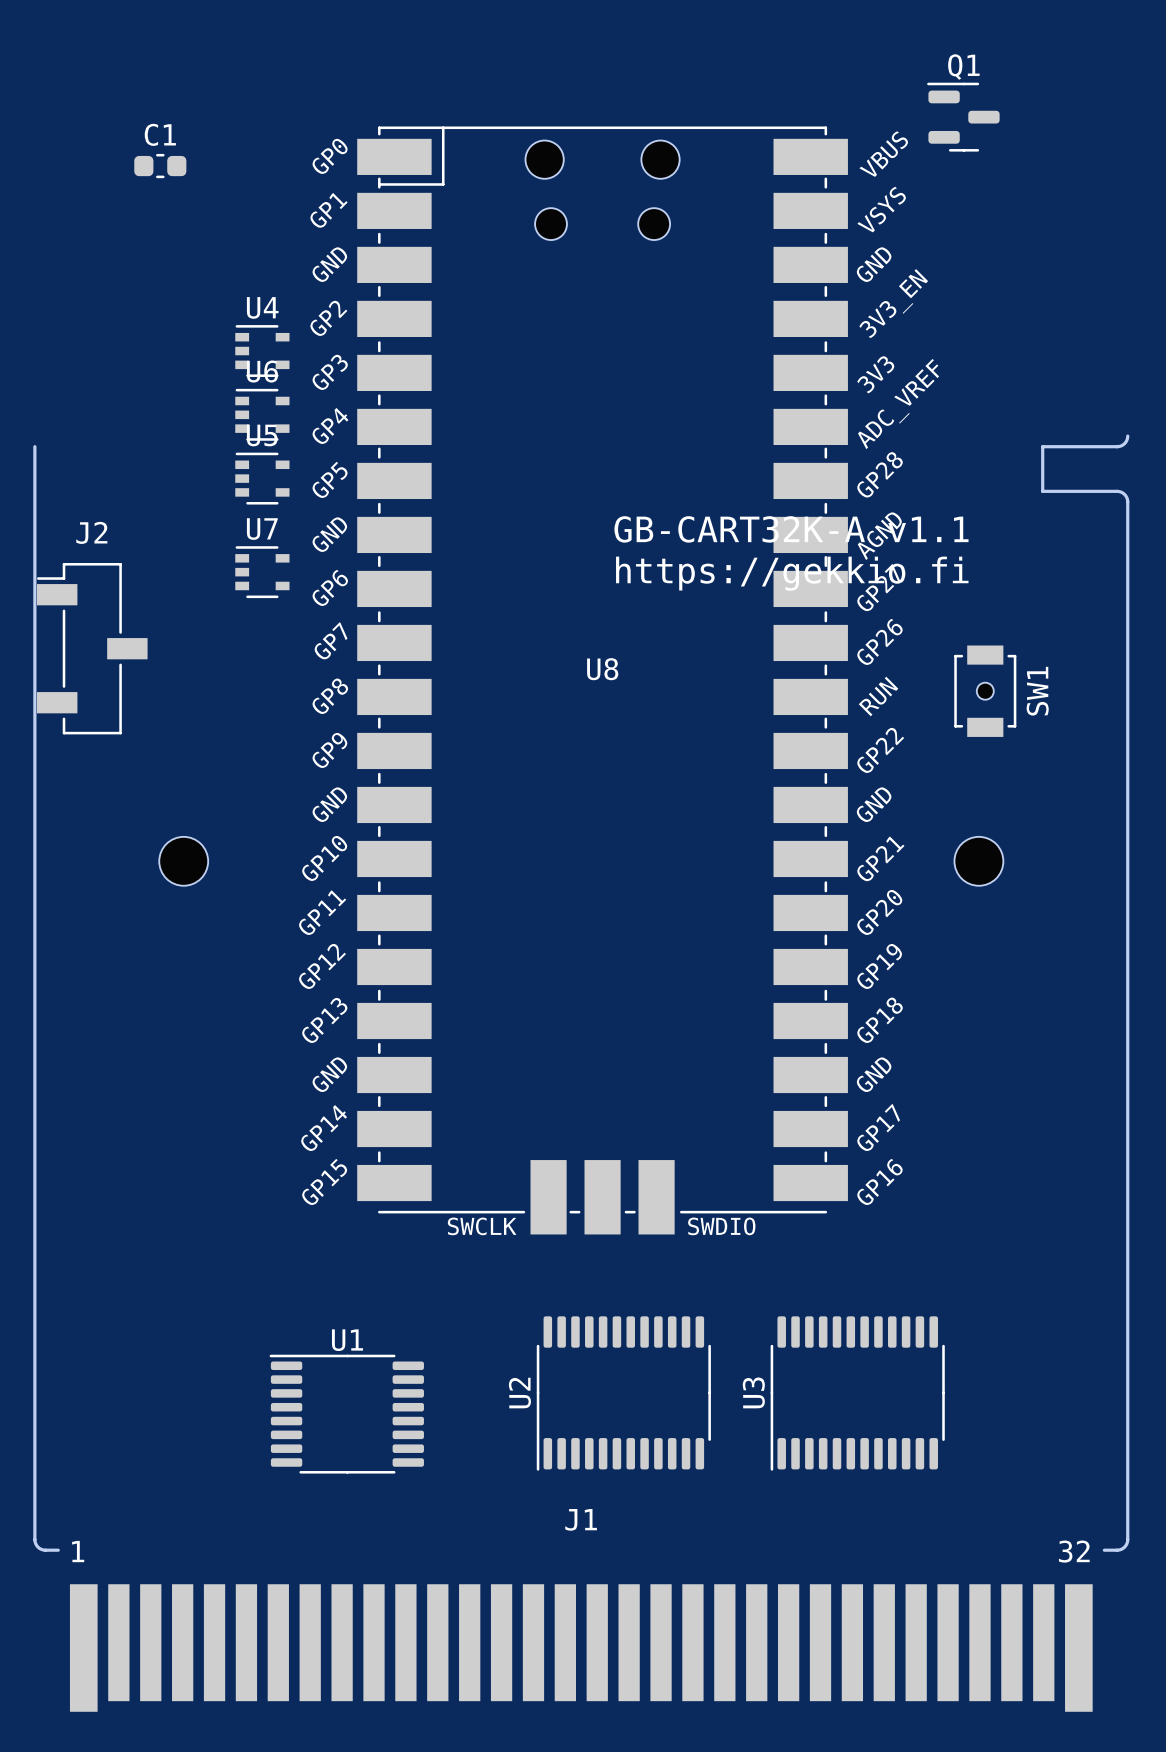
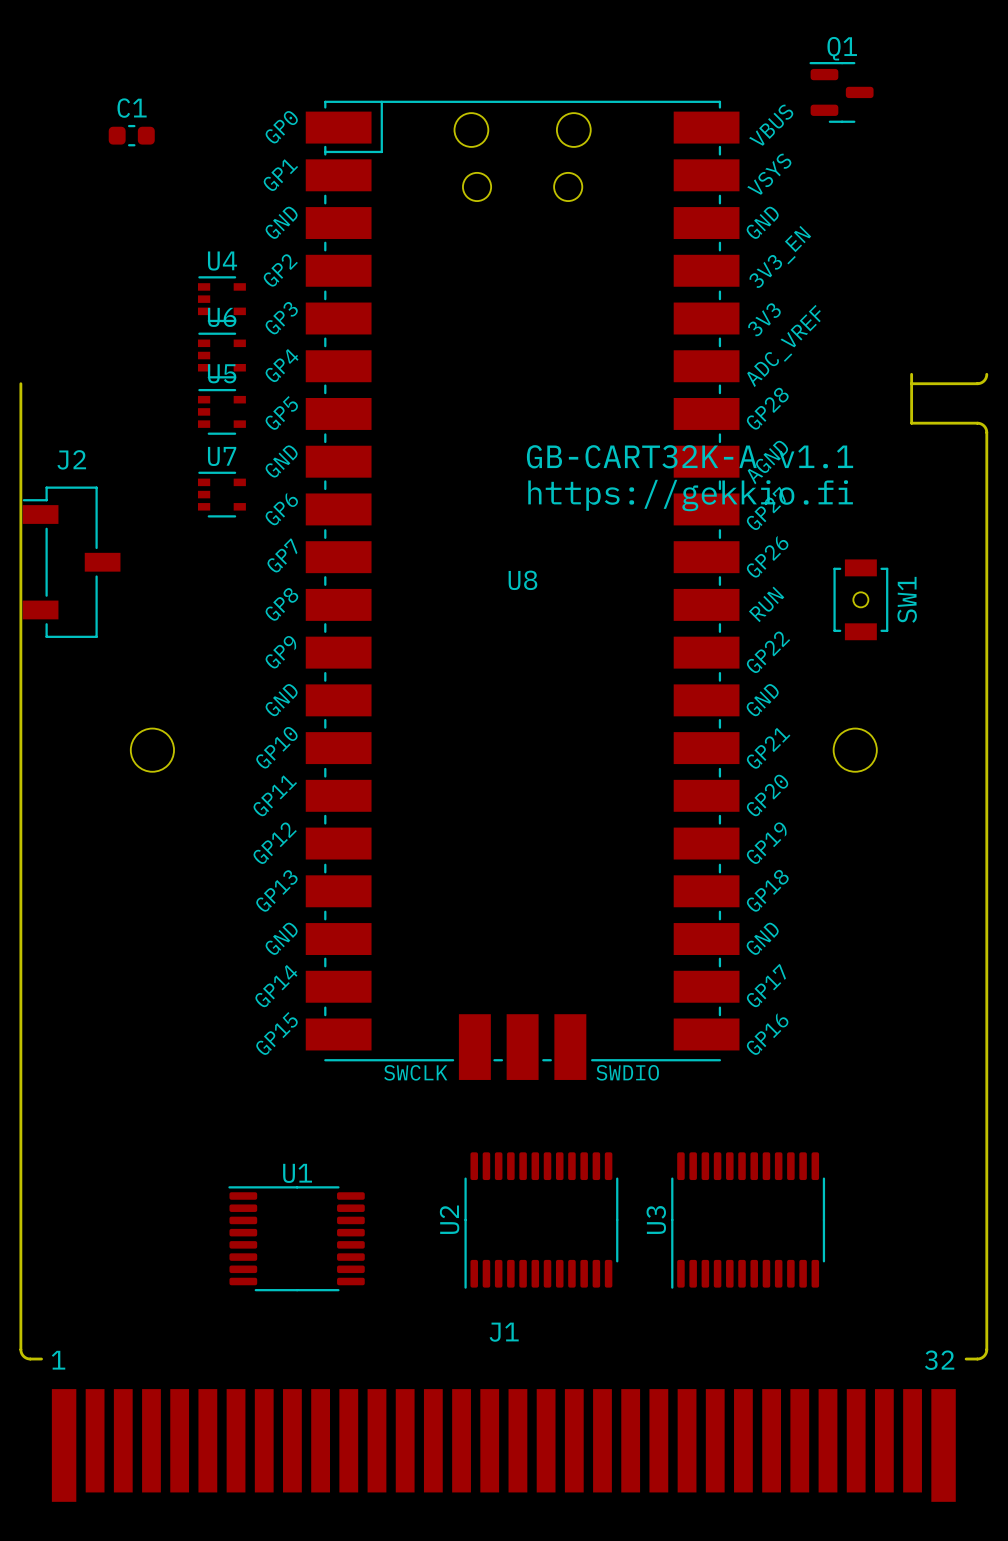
board edge: none -> (911, 374) (911, 383)

